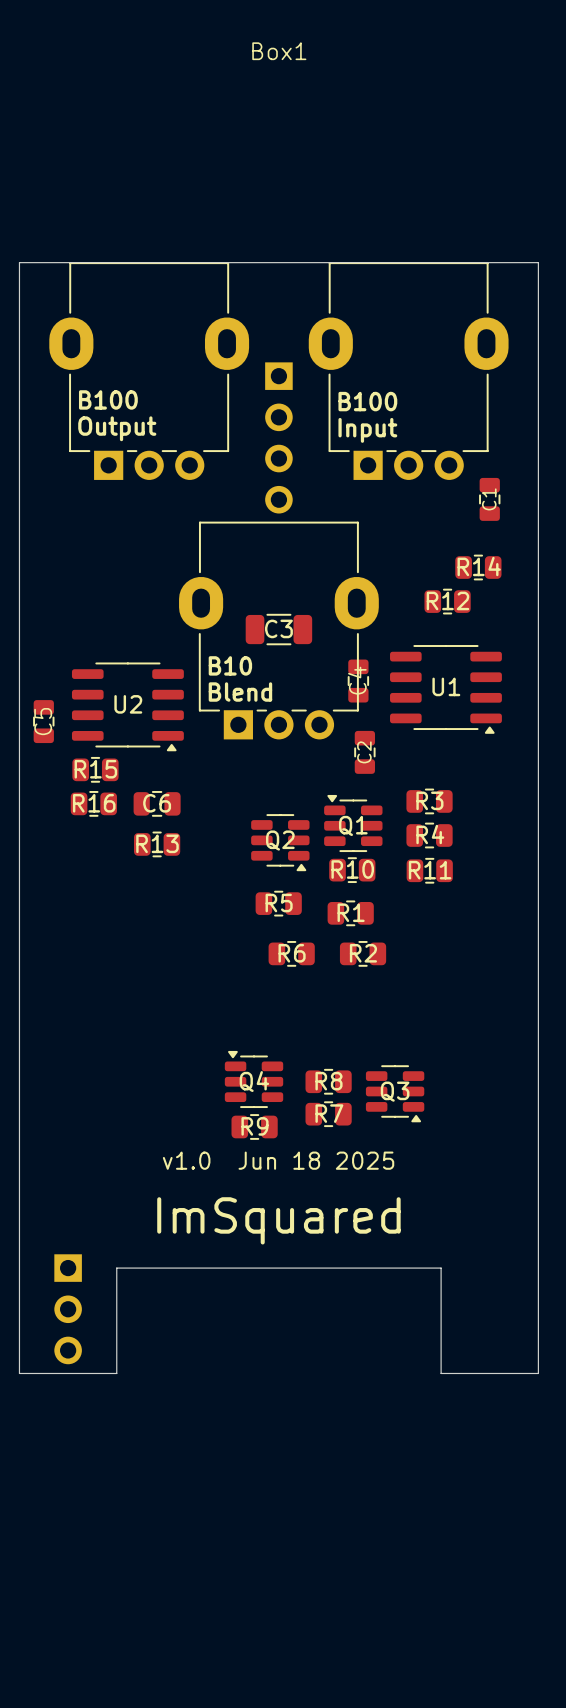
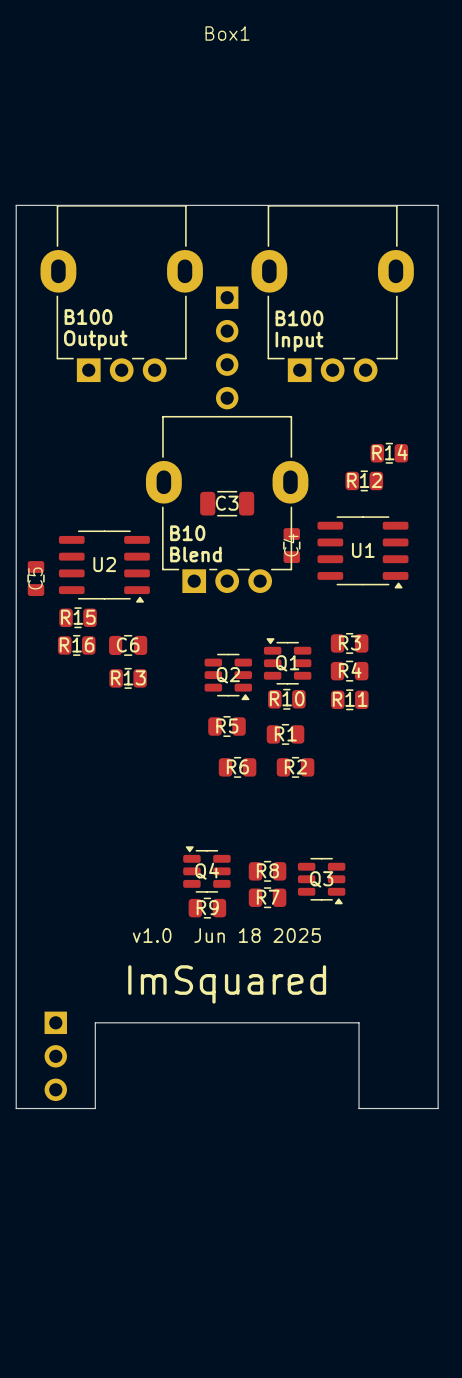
C1: (489, 499) -> none
C2: (364, 752) -> none

